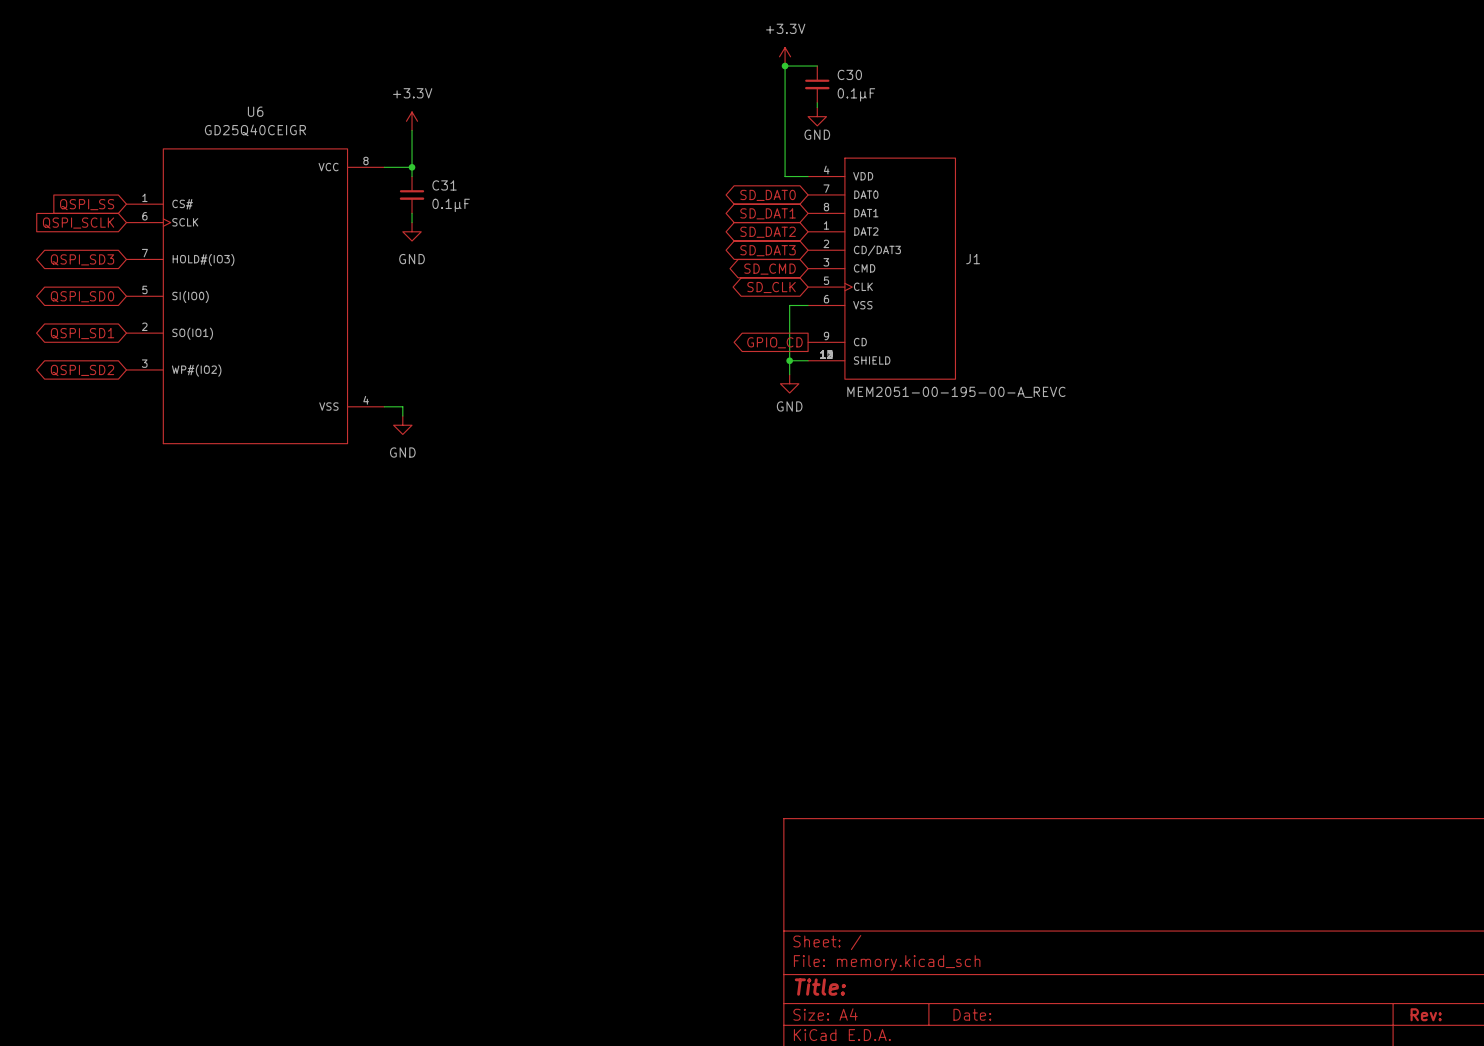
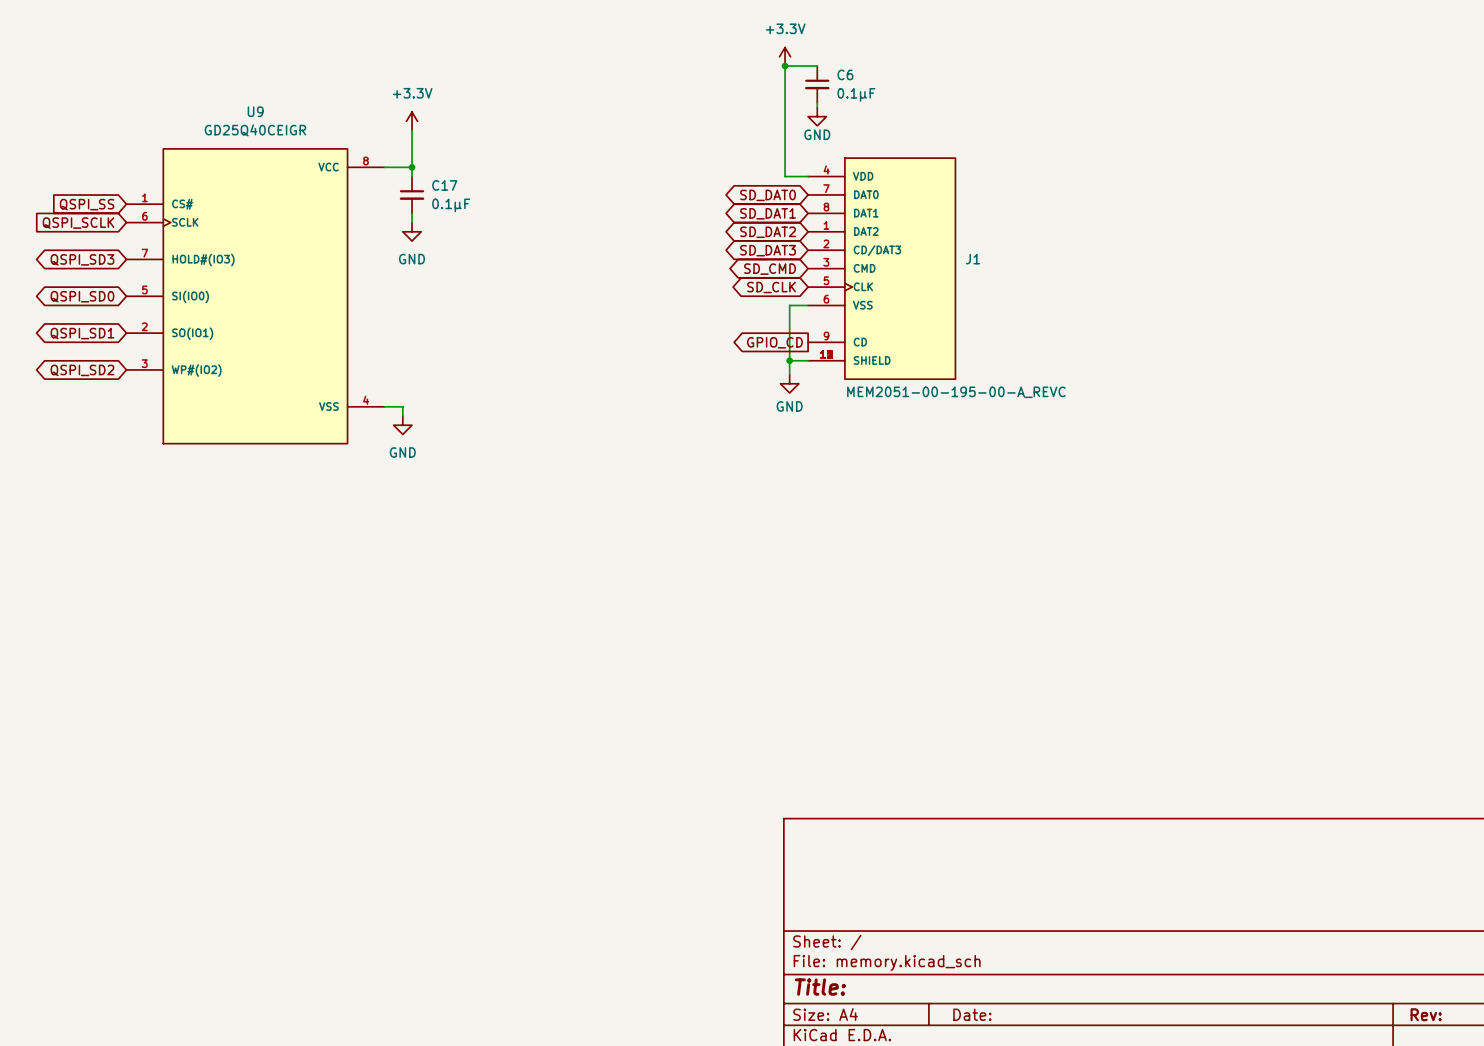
C30 name: C30 (849, 74) -> C6 (845, 74)
U6 name: U6 (255, 111) -> U9 (255, 111)
C31 name: C31 (444, 185) -> C17 (444, 185)

